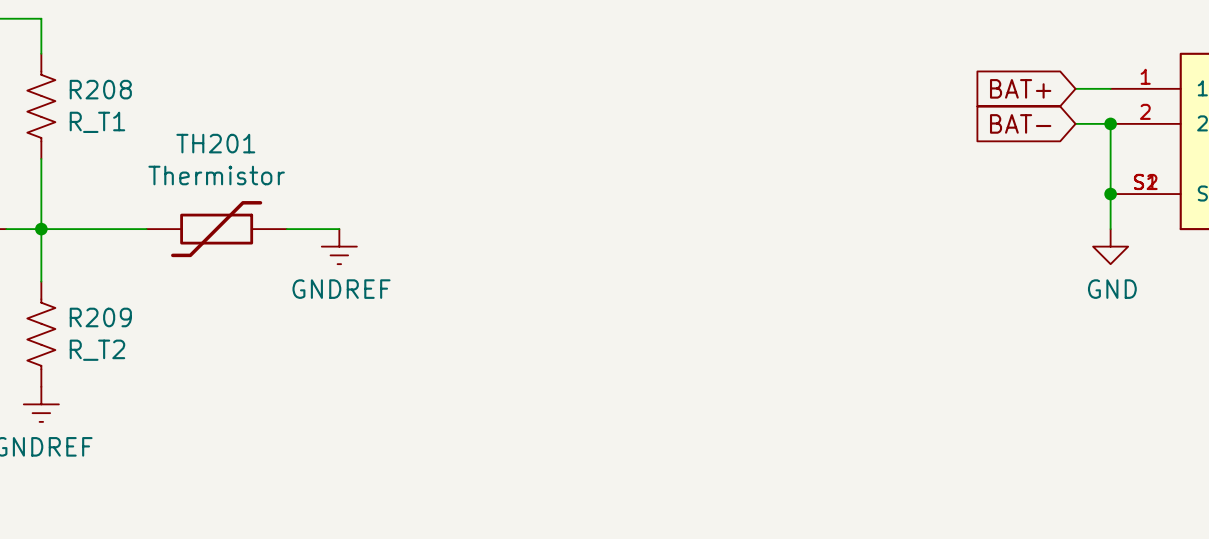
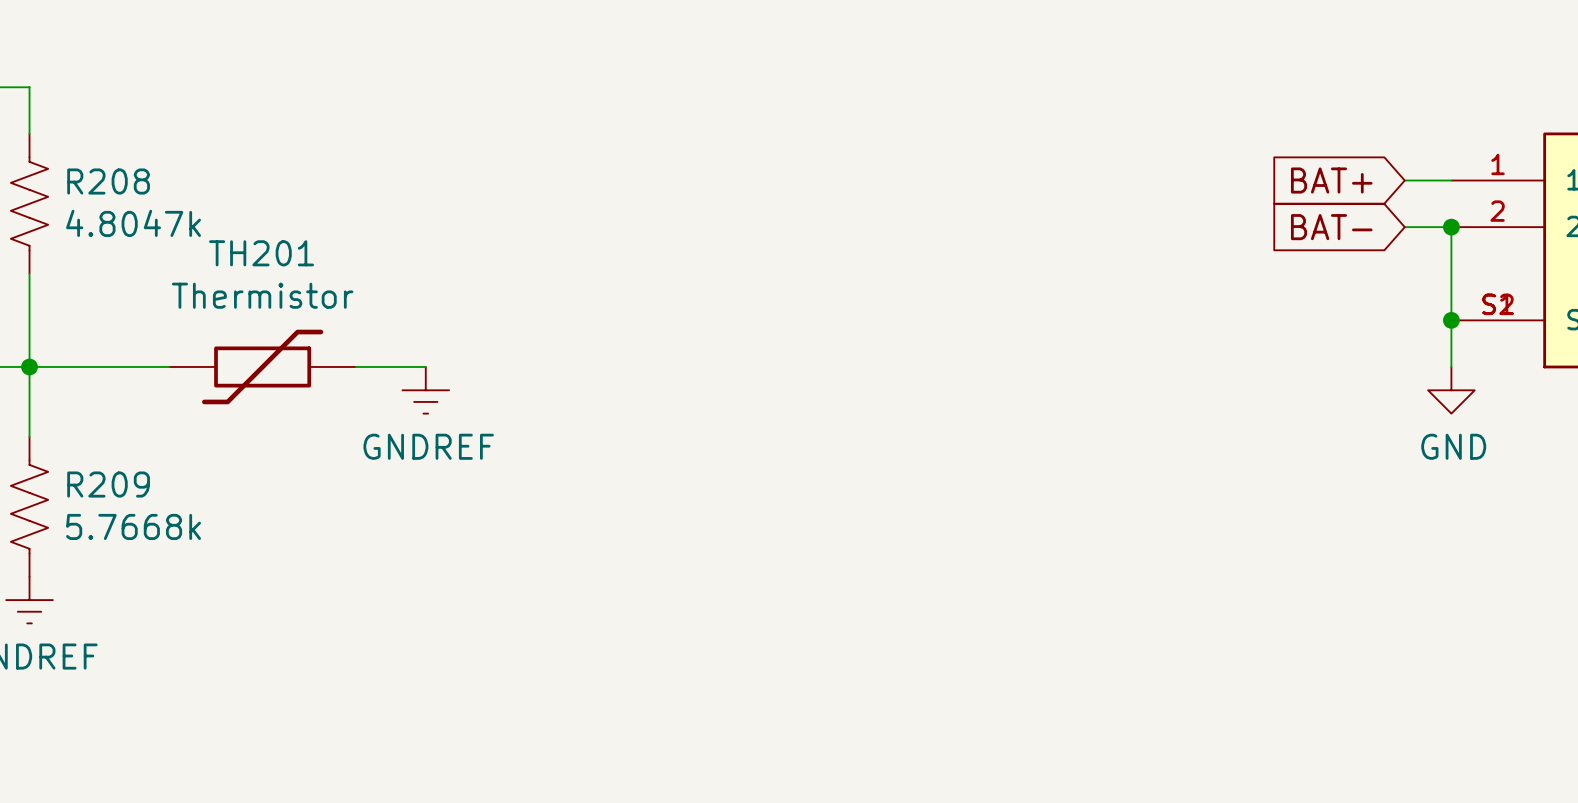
R208 value: R_T1 (97, 122) -> 4.8047k (133, 223)
R209 value: R_T2 (97, 350) -> 5.7668k (133, 526)

